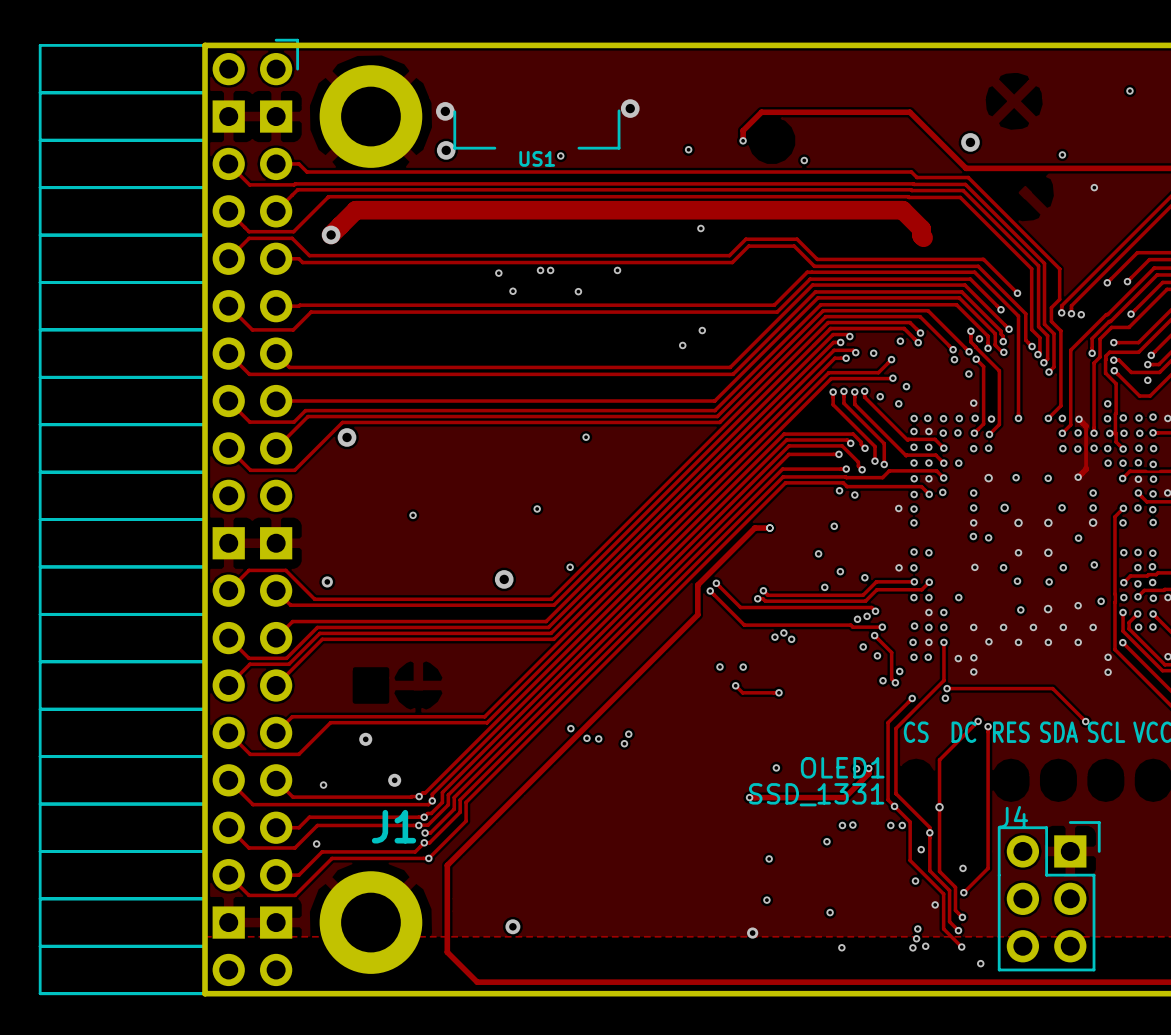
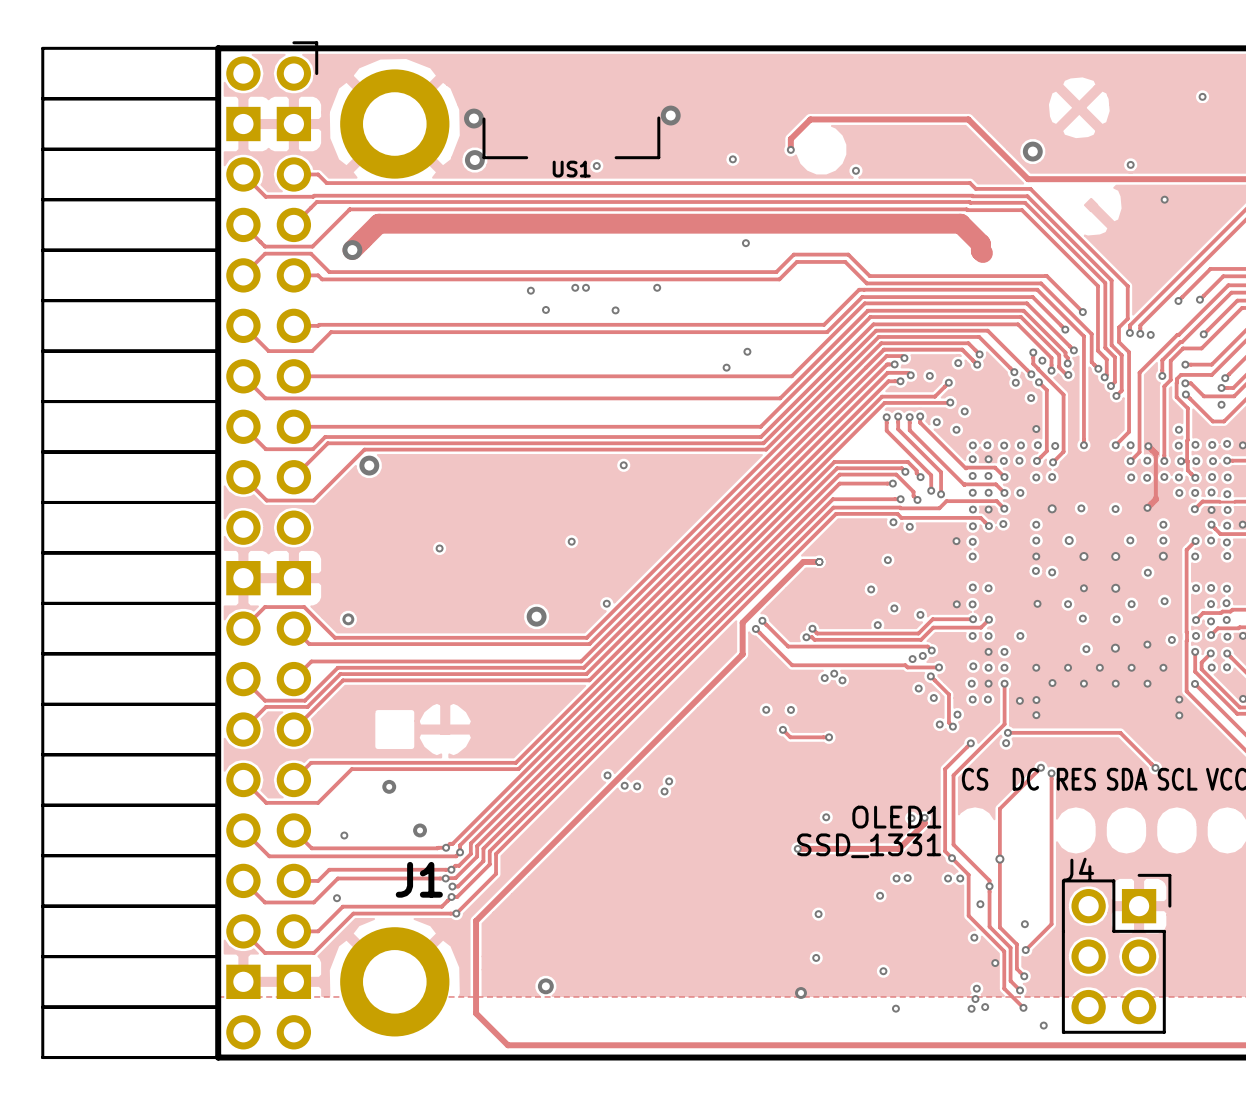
track: (276, 353) (289, 367) (730, 367) (744, 353) -> (293, 376) (791, 376)

